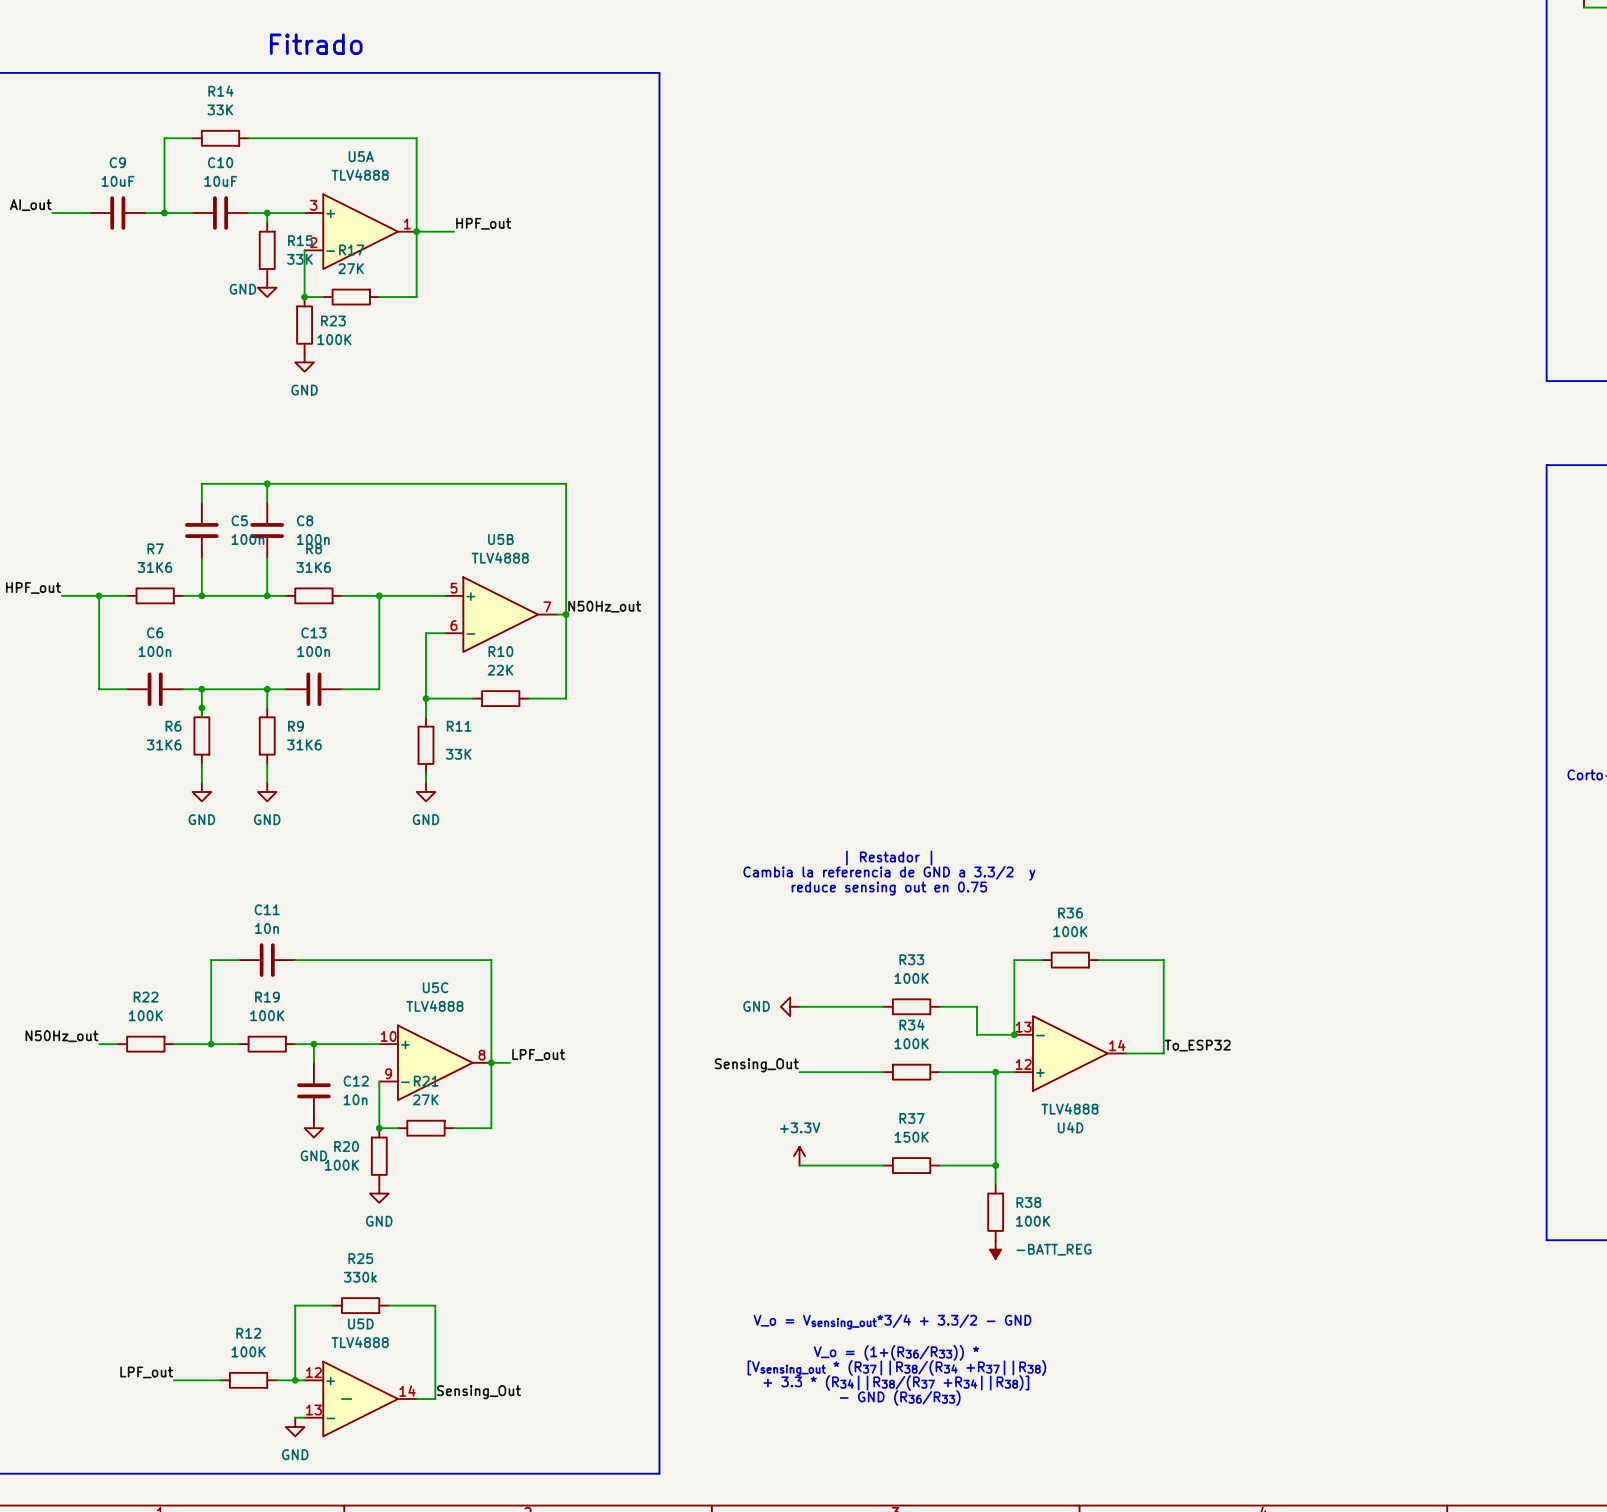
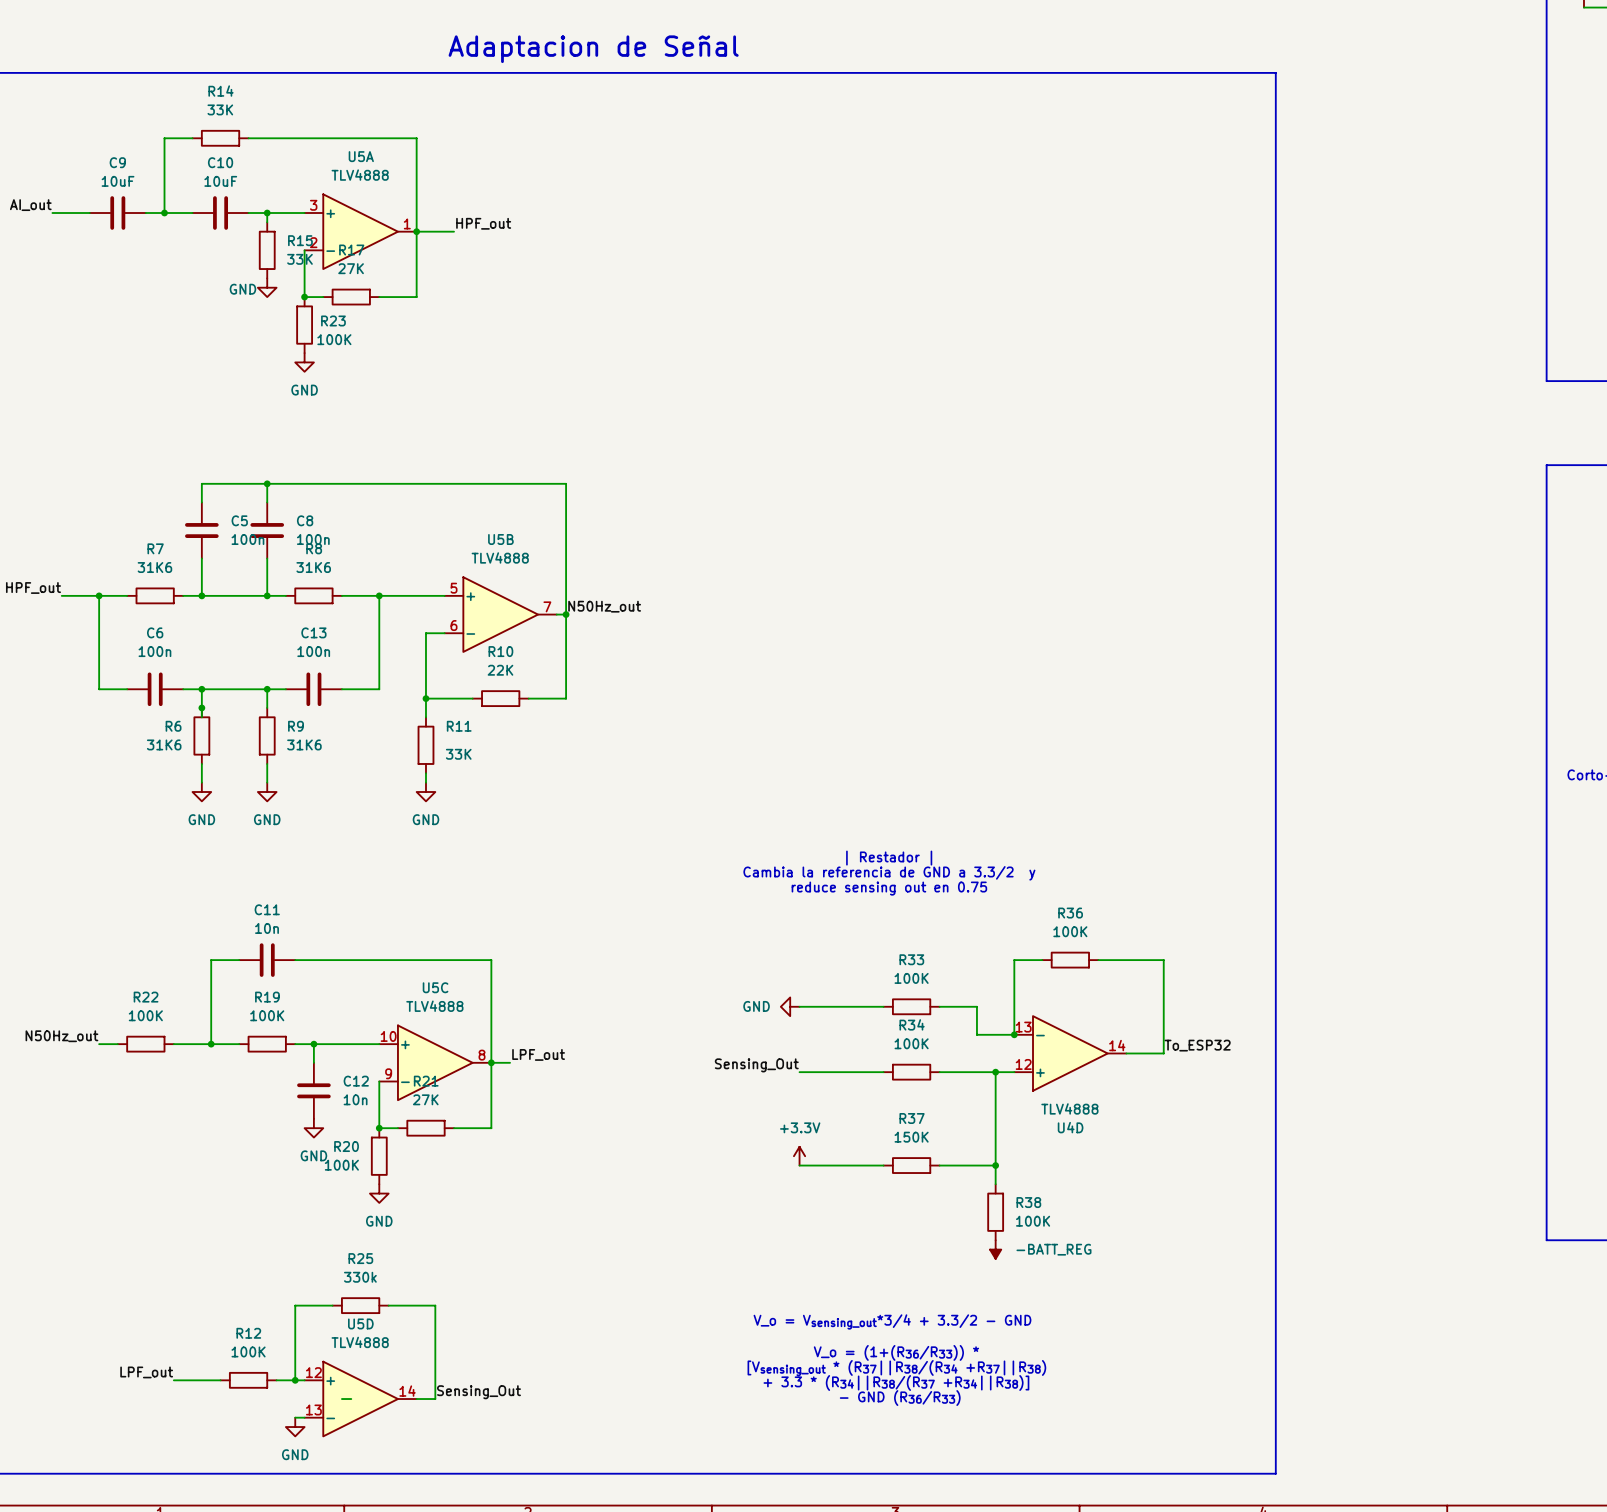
text: Fitrado (316, 44) -> none
text: none -> Adaptacion de Señal (593, 49)
line: (659, 72) (659, 1473) -> (659, 72) (1275, 72) (1275, 1473) (659, 1473)

